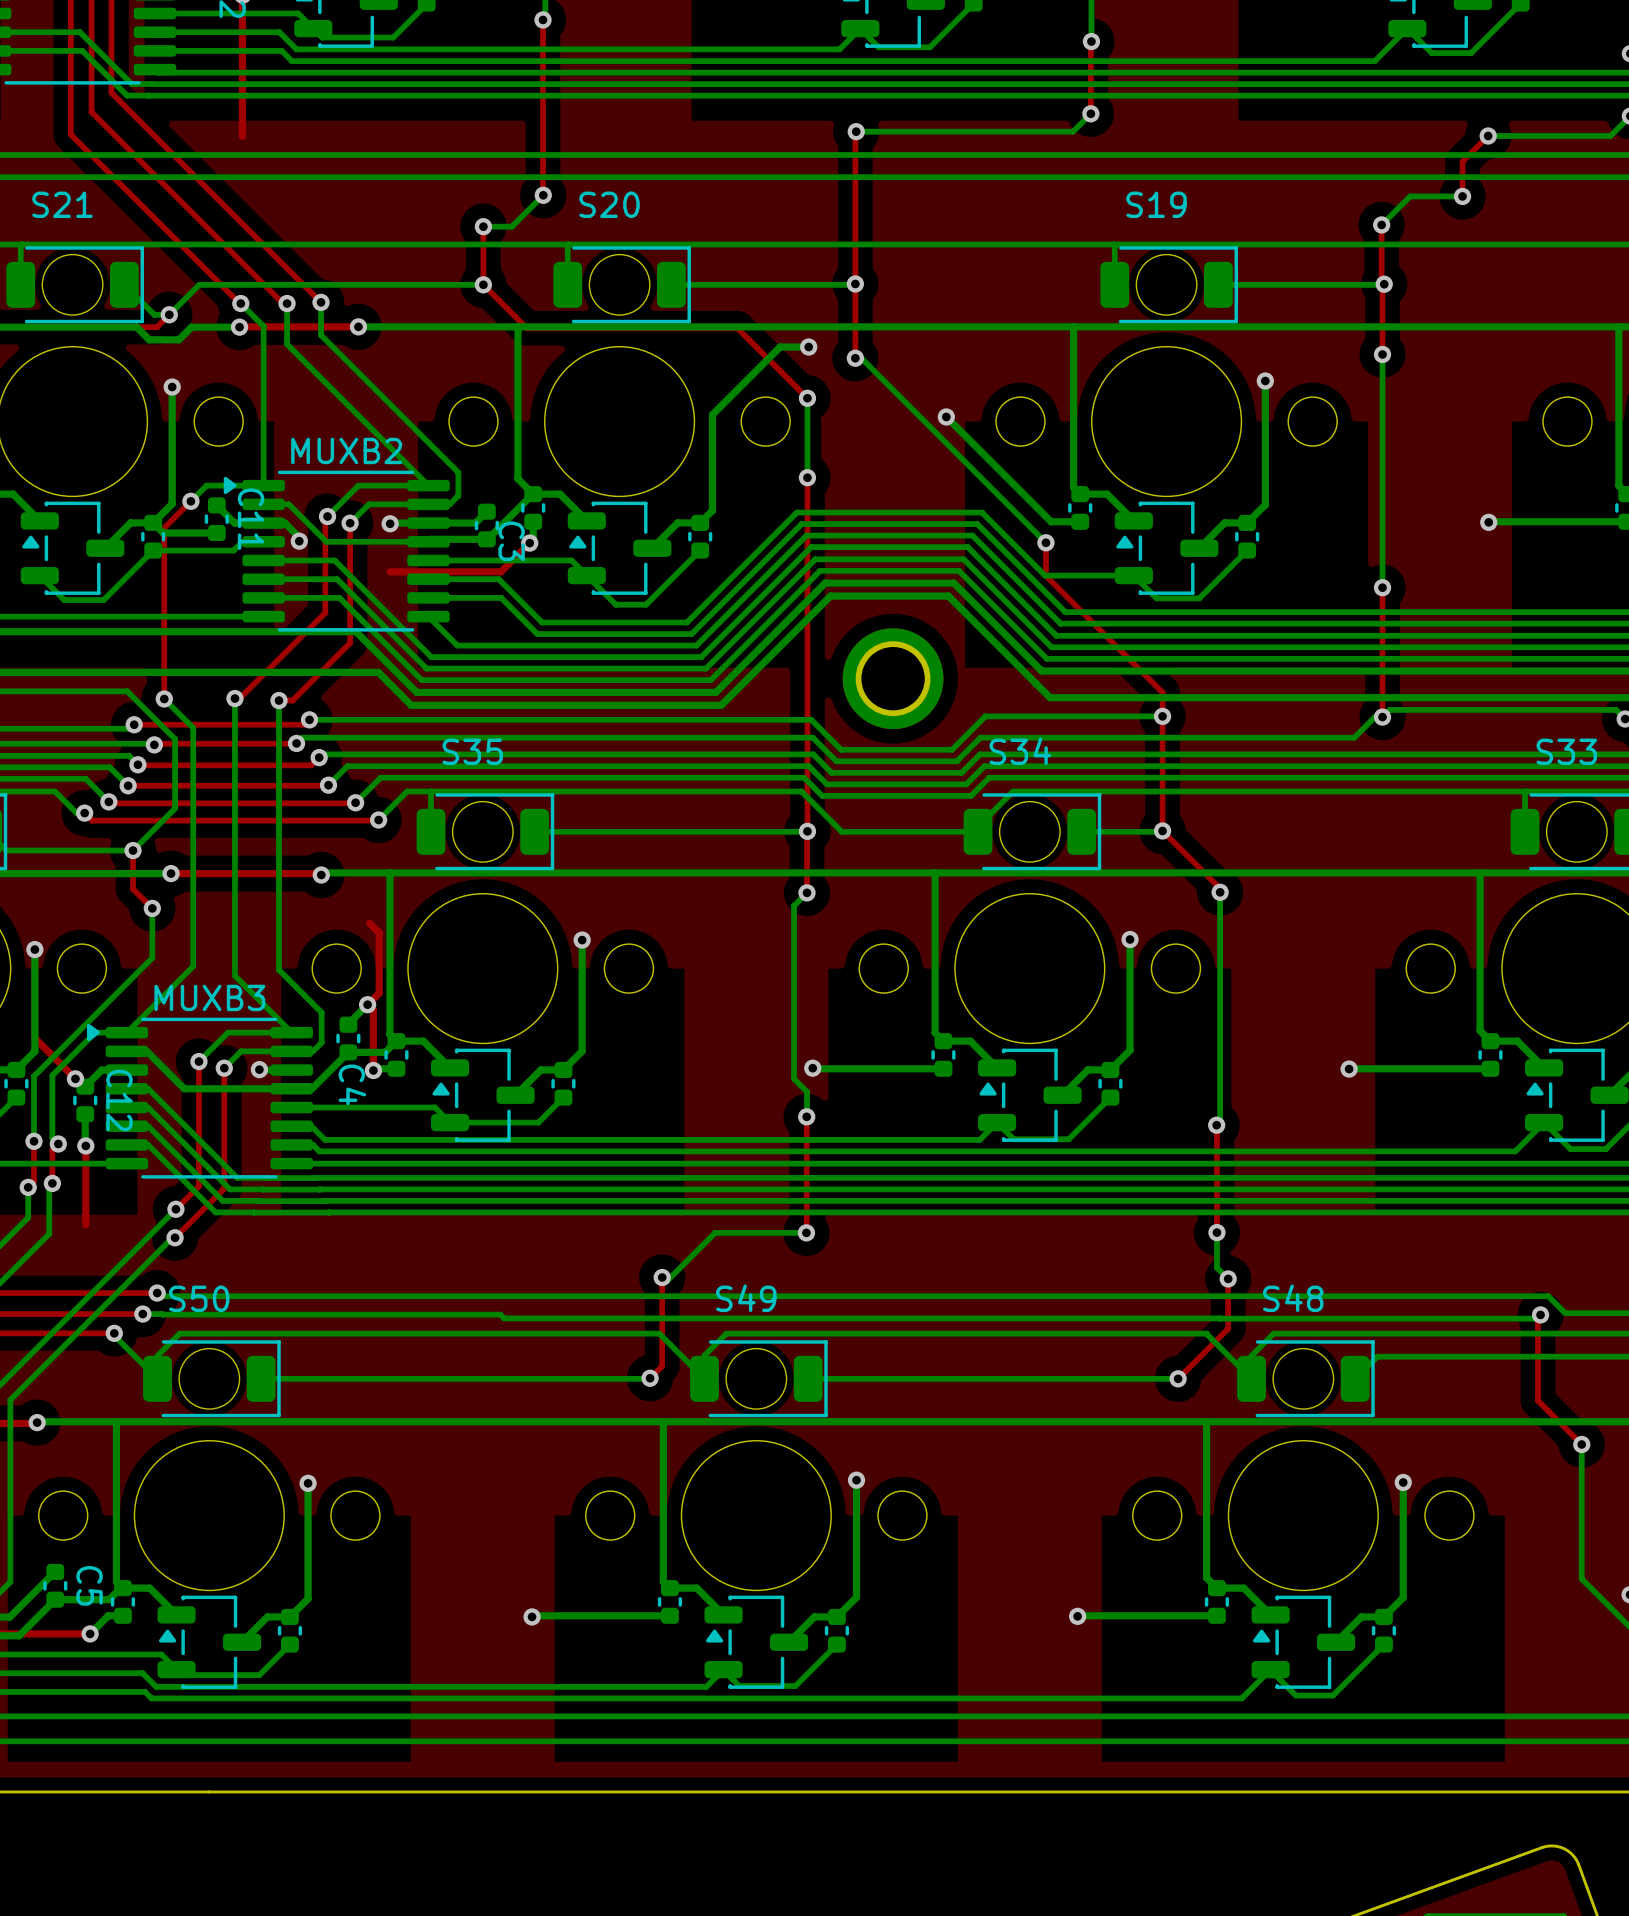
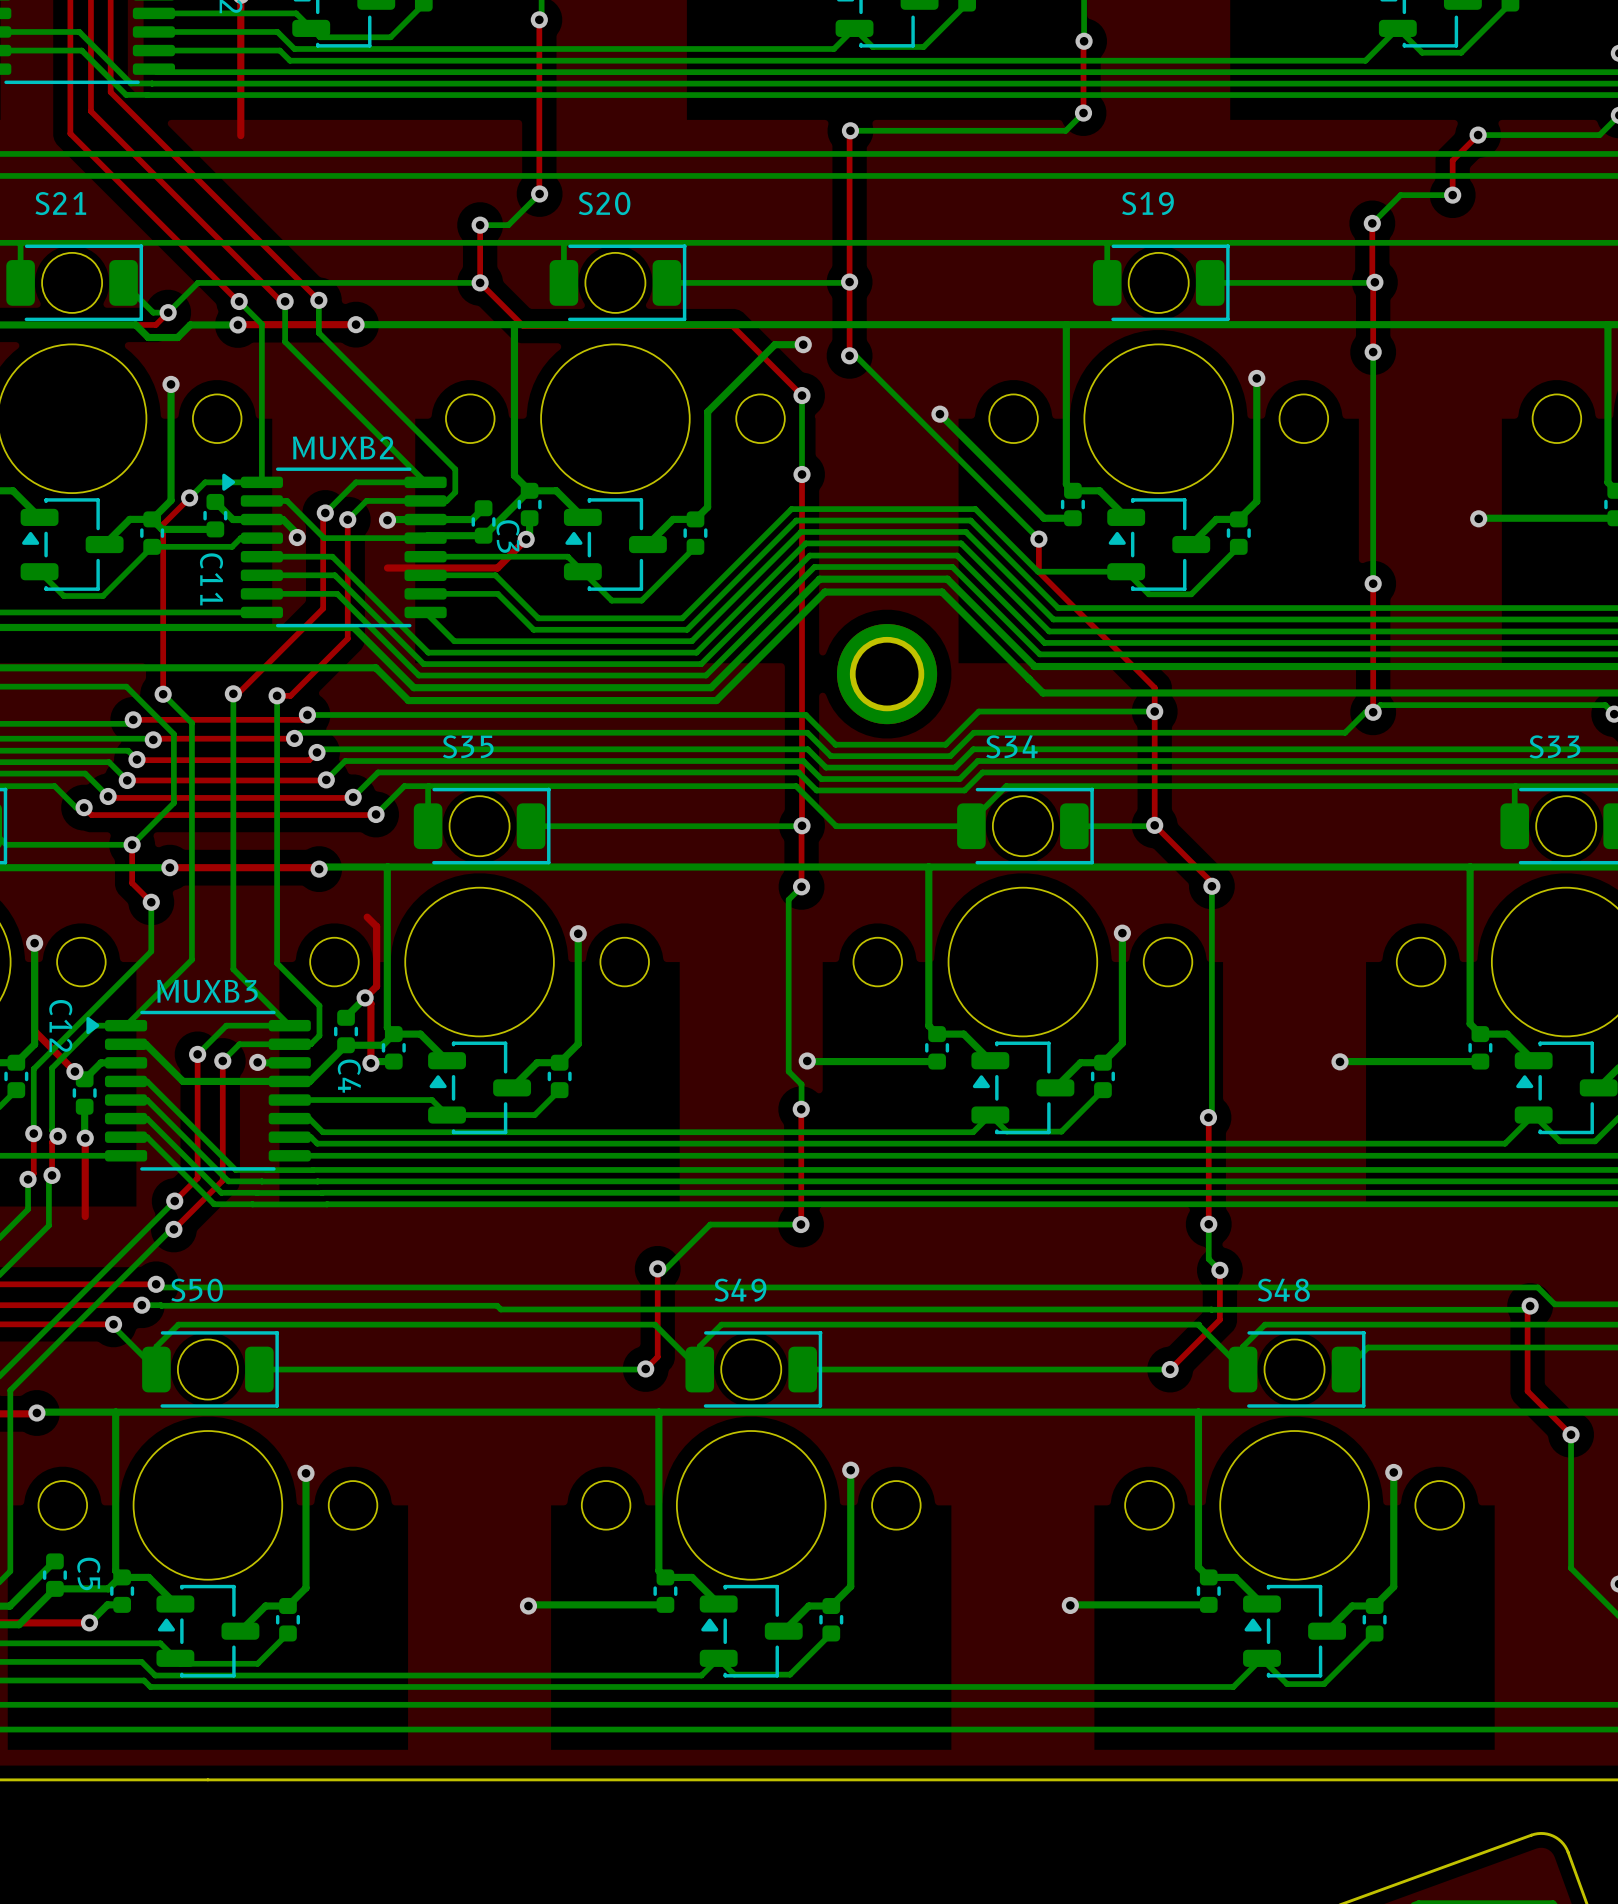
C11 name position: C11 (251, 519) -> C11 (211, 579)
C12 name position: C12 (119, 1100) -> C12 (60, 1026)

